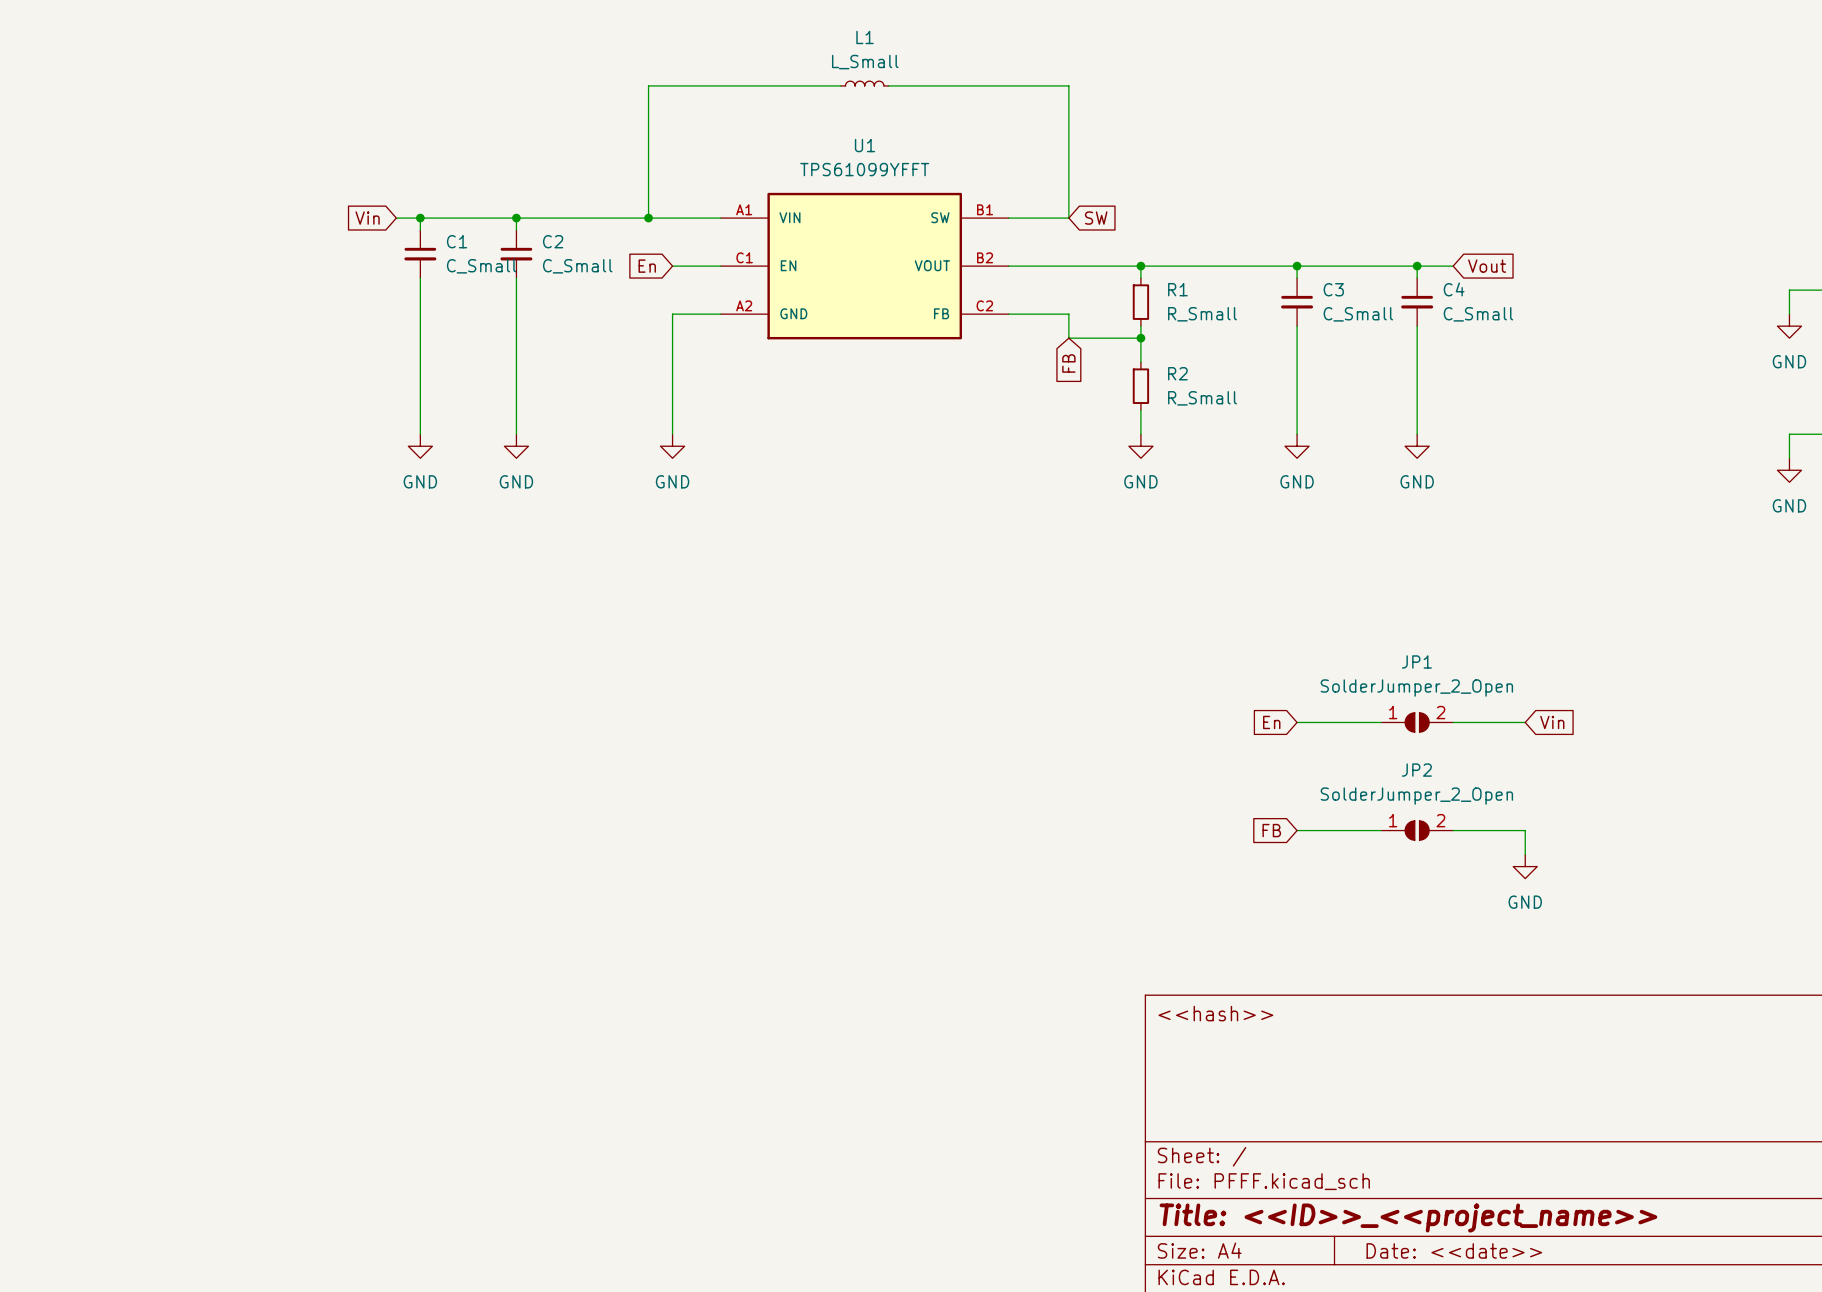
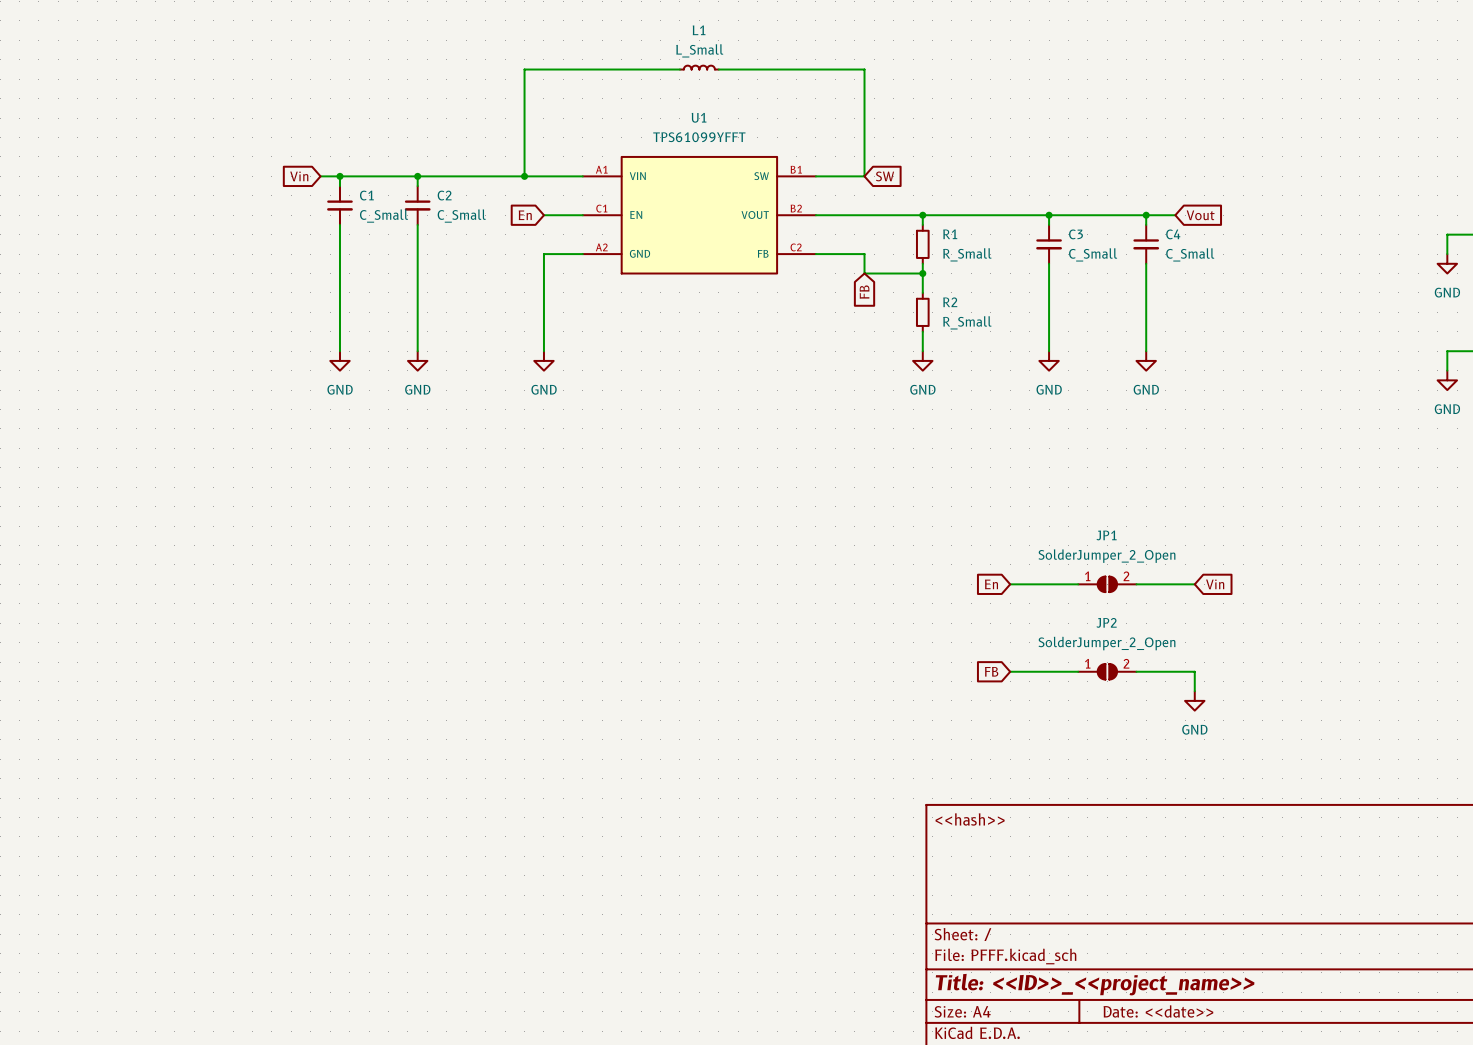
global label position: En (1271, 722) -> En (991, 584)
JP1 position: (1417, 722) -> (1107, 584)
wire: (1477, 722) (1525, 722) -> (1010, 584) (1049, 584)
global label position: Vin (1552, 722) -> Vin (1215, 584)
wire: none -> (1010, 671) (1049, 671)
global label position: FB (1271, 830) -> FB (991, 671)
JP2 position: (1417, 830) -> (1107, 671)
wire: (1477, 830) (1525, 830) (1525, 854) -> (1194, 671) (1194, 691)
power symbol position: GND (1525, 866) -> GND (1194, 700)

